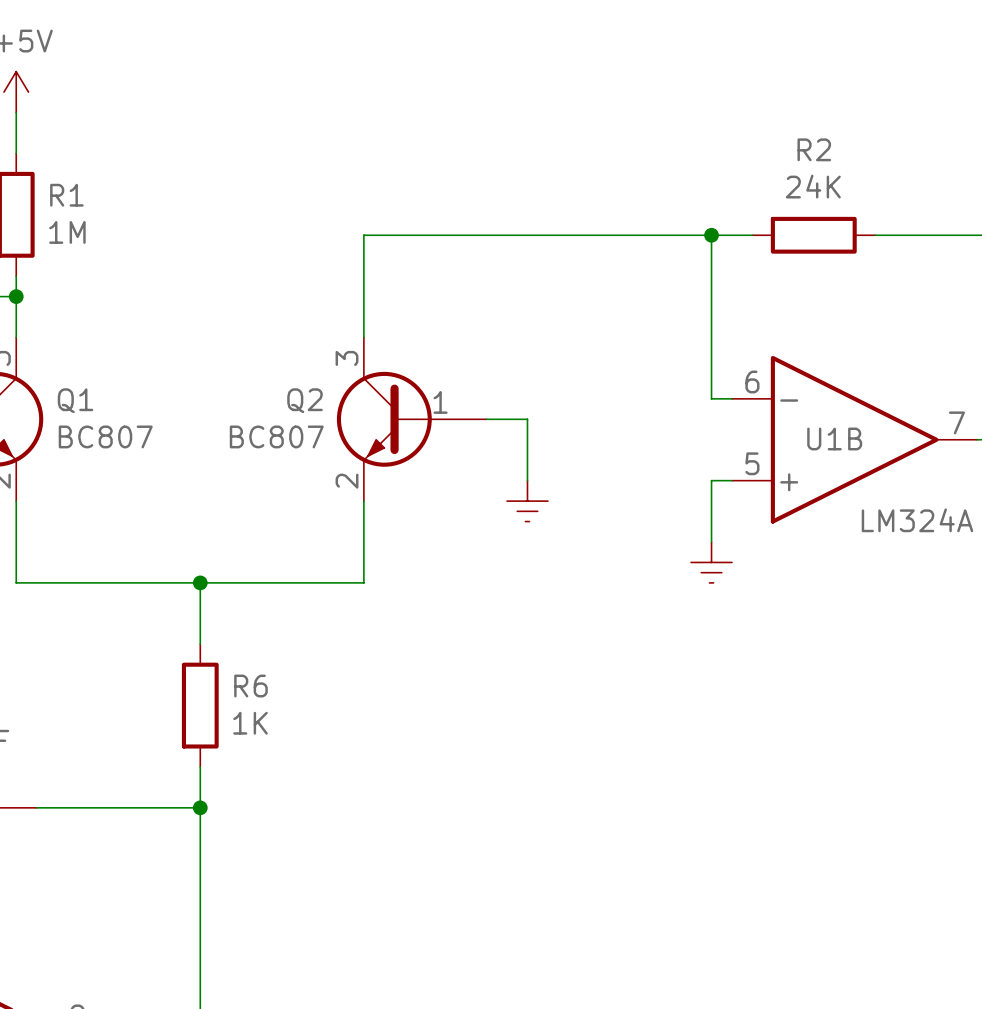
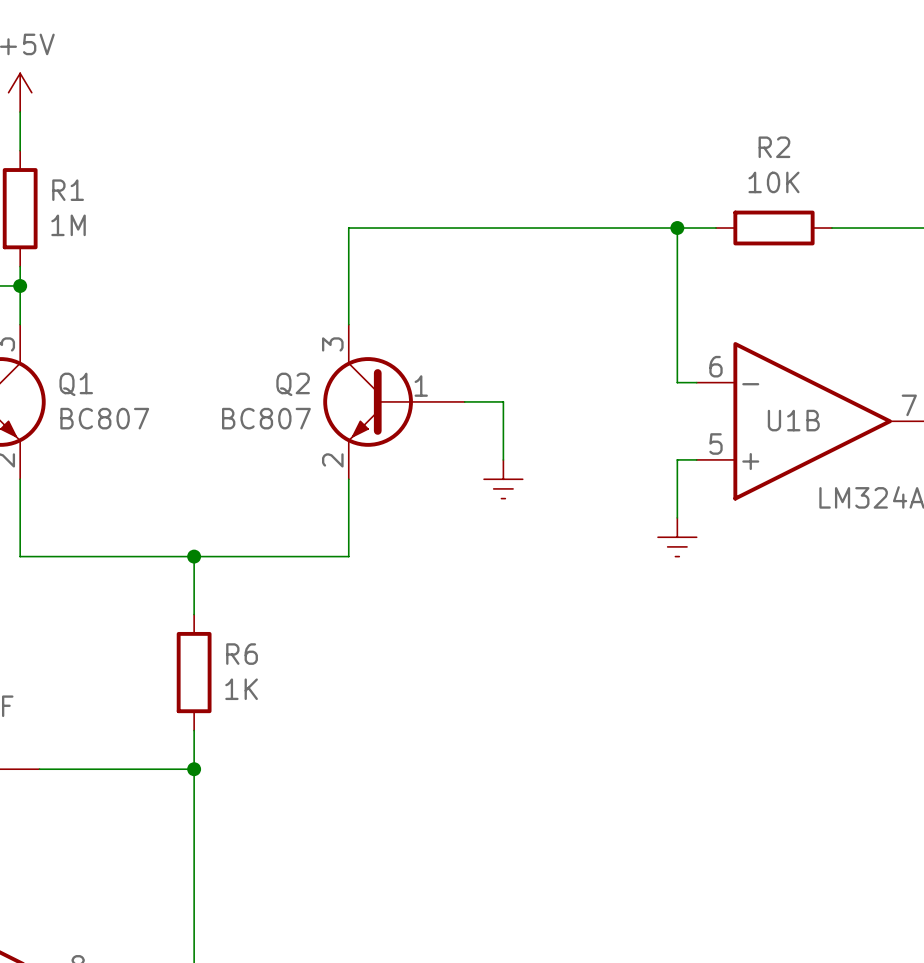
R2 value: 24K (813, 186) -> 10K (773, 182)

